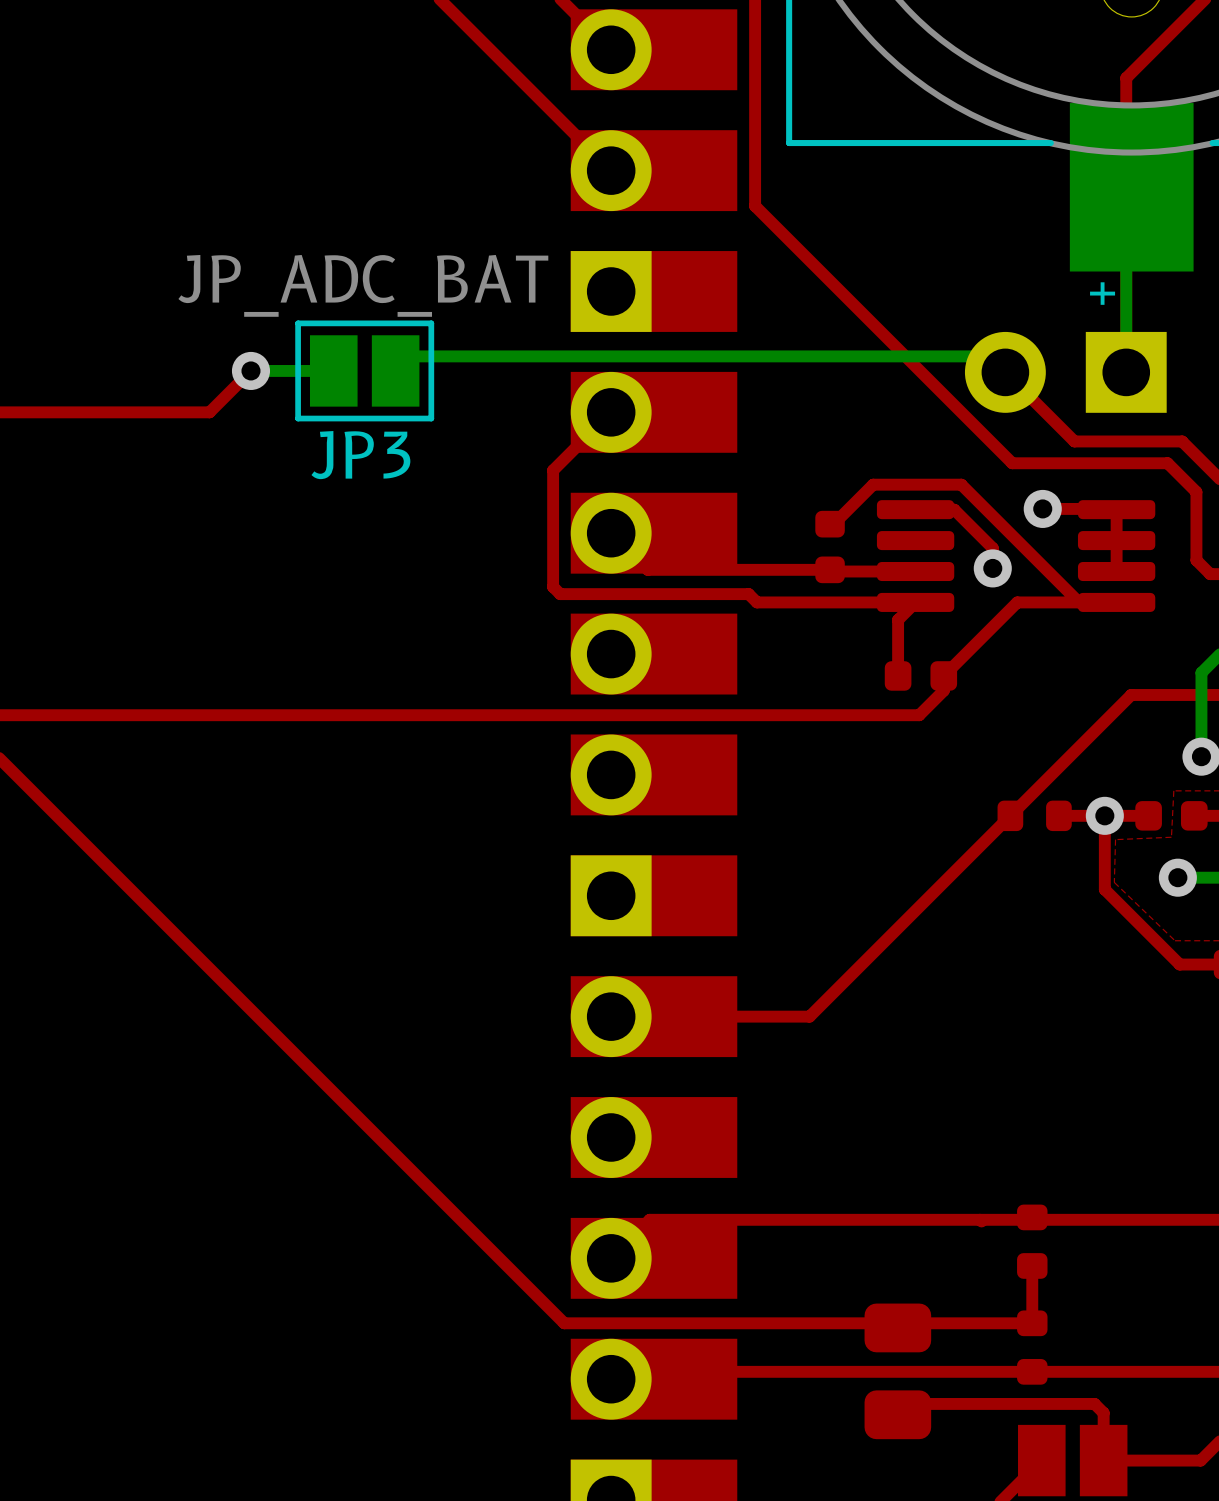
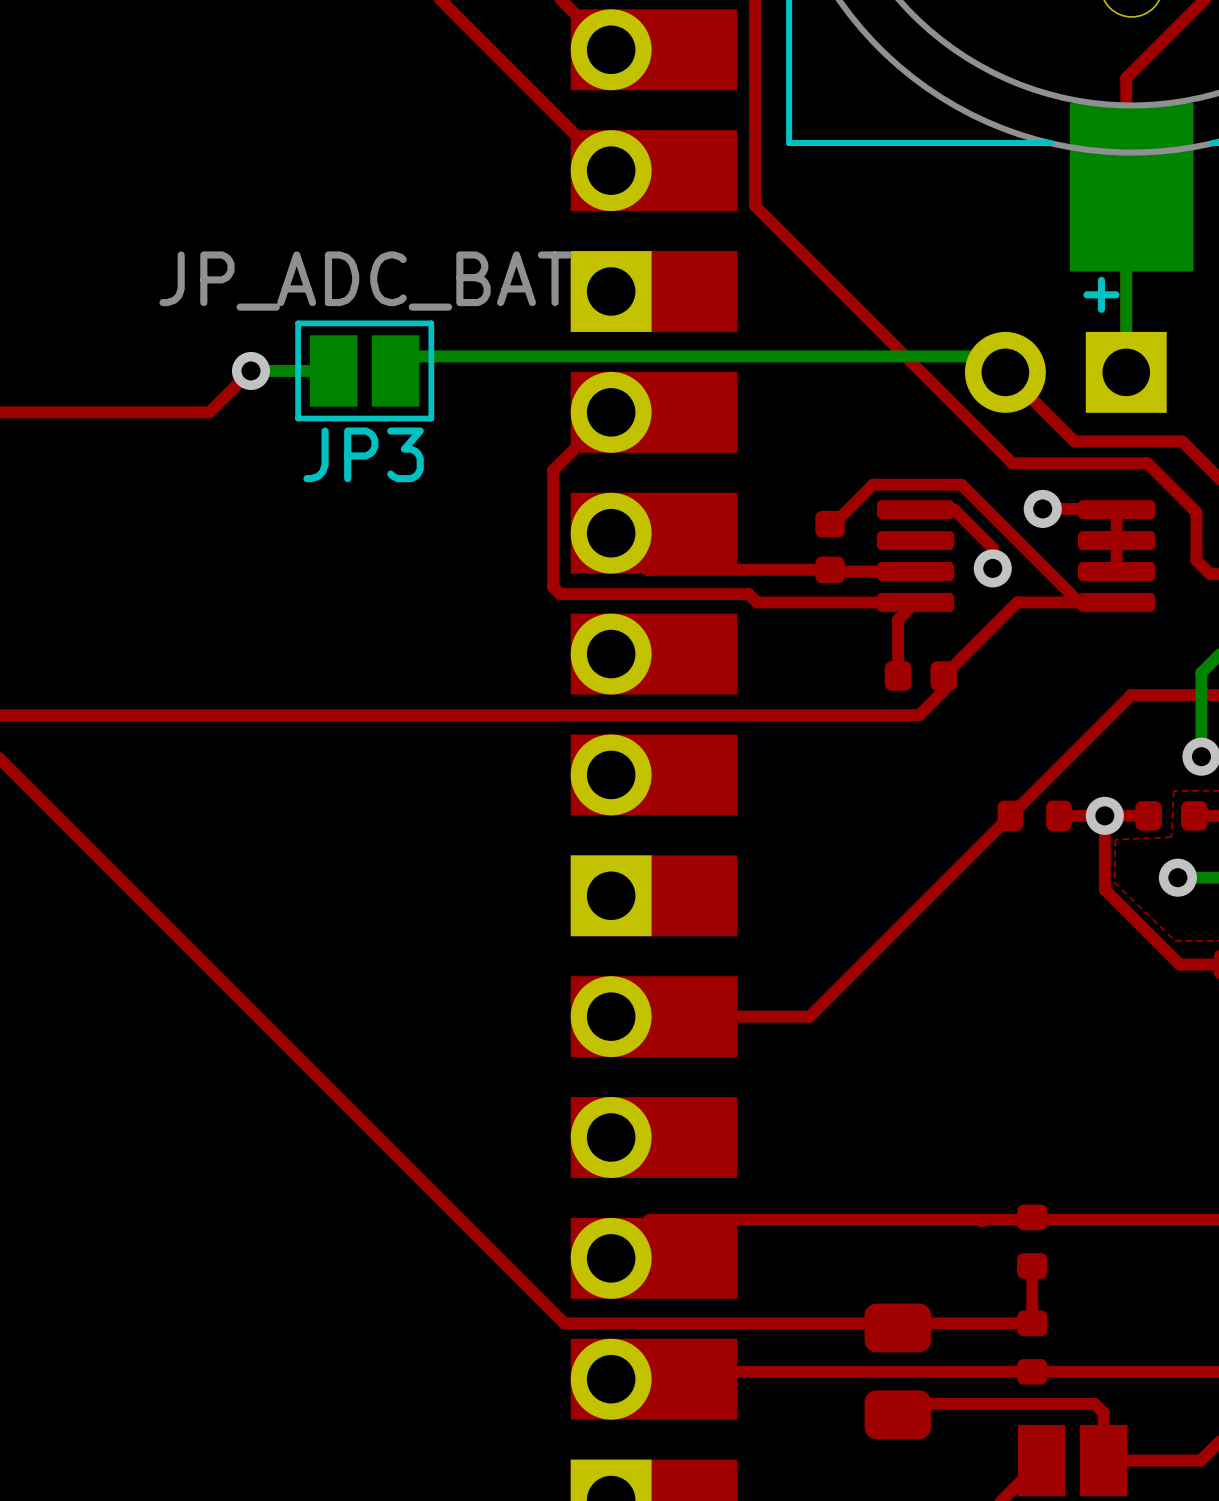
top track: (1147, 463) (1167, 463) (1196, 492) (1196, 512) -> (1147, 463) (1196, 512)

